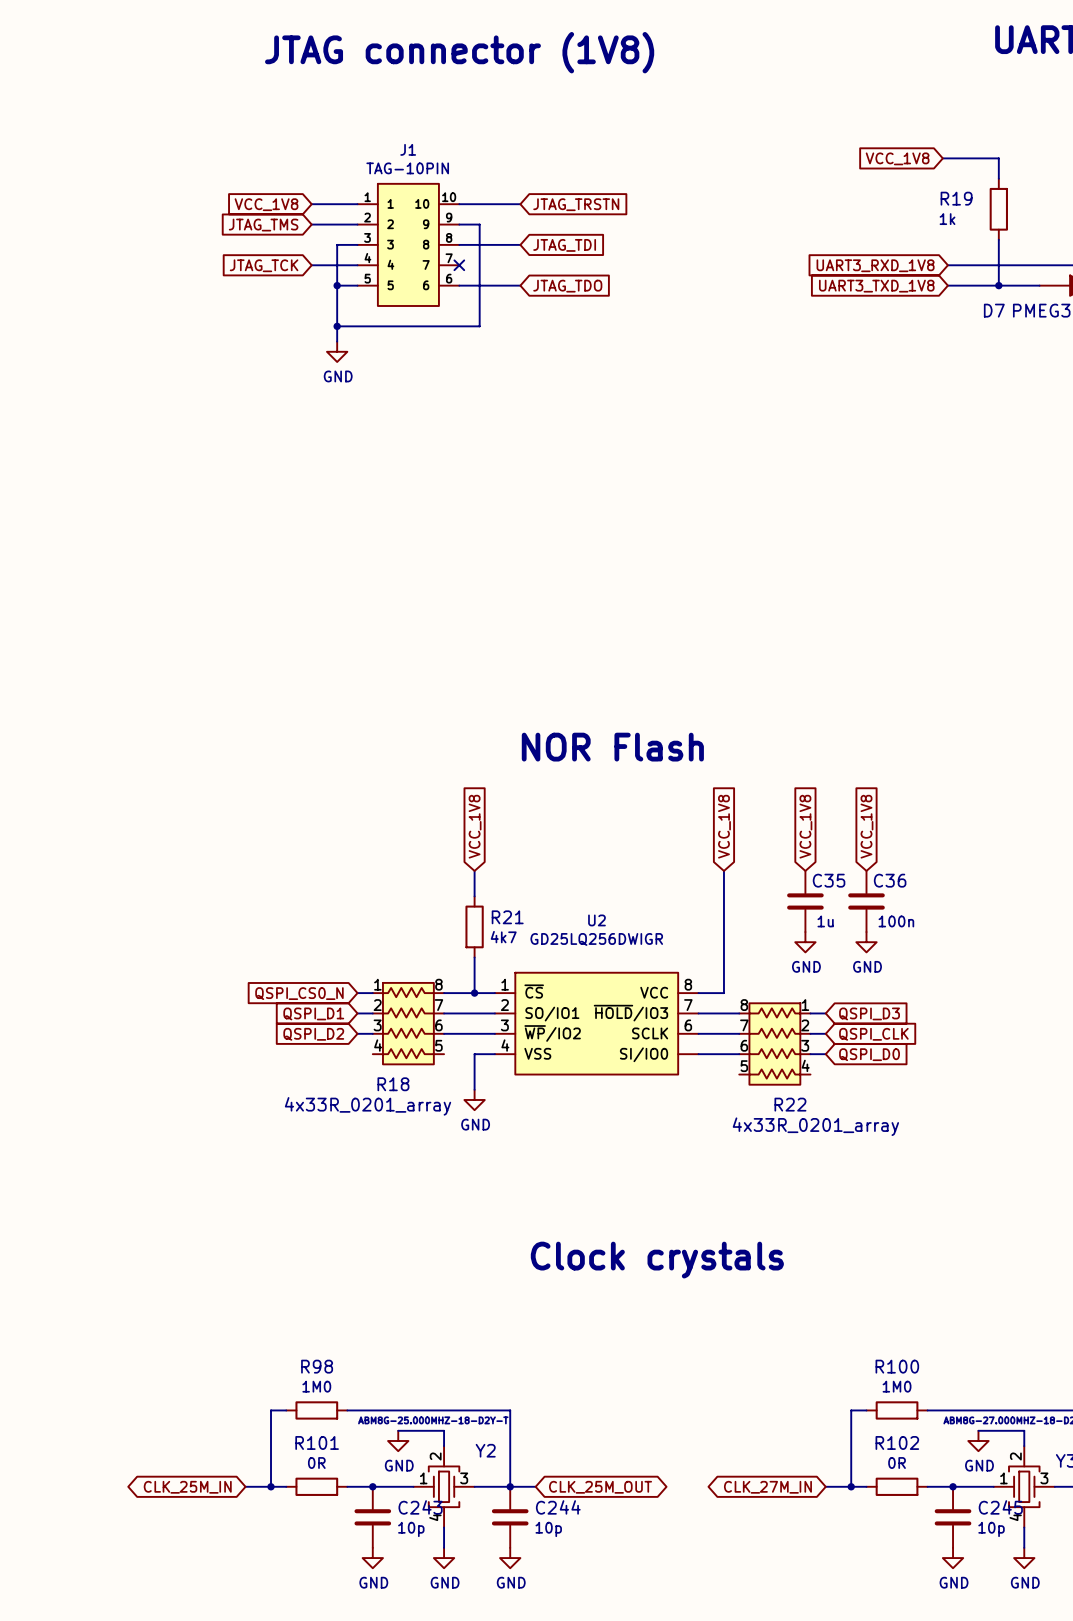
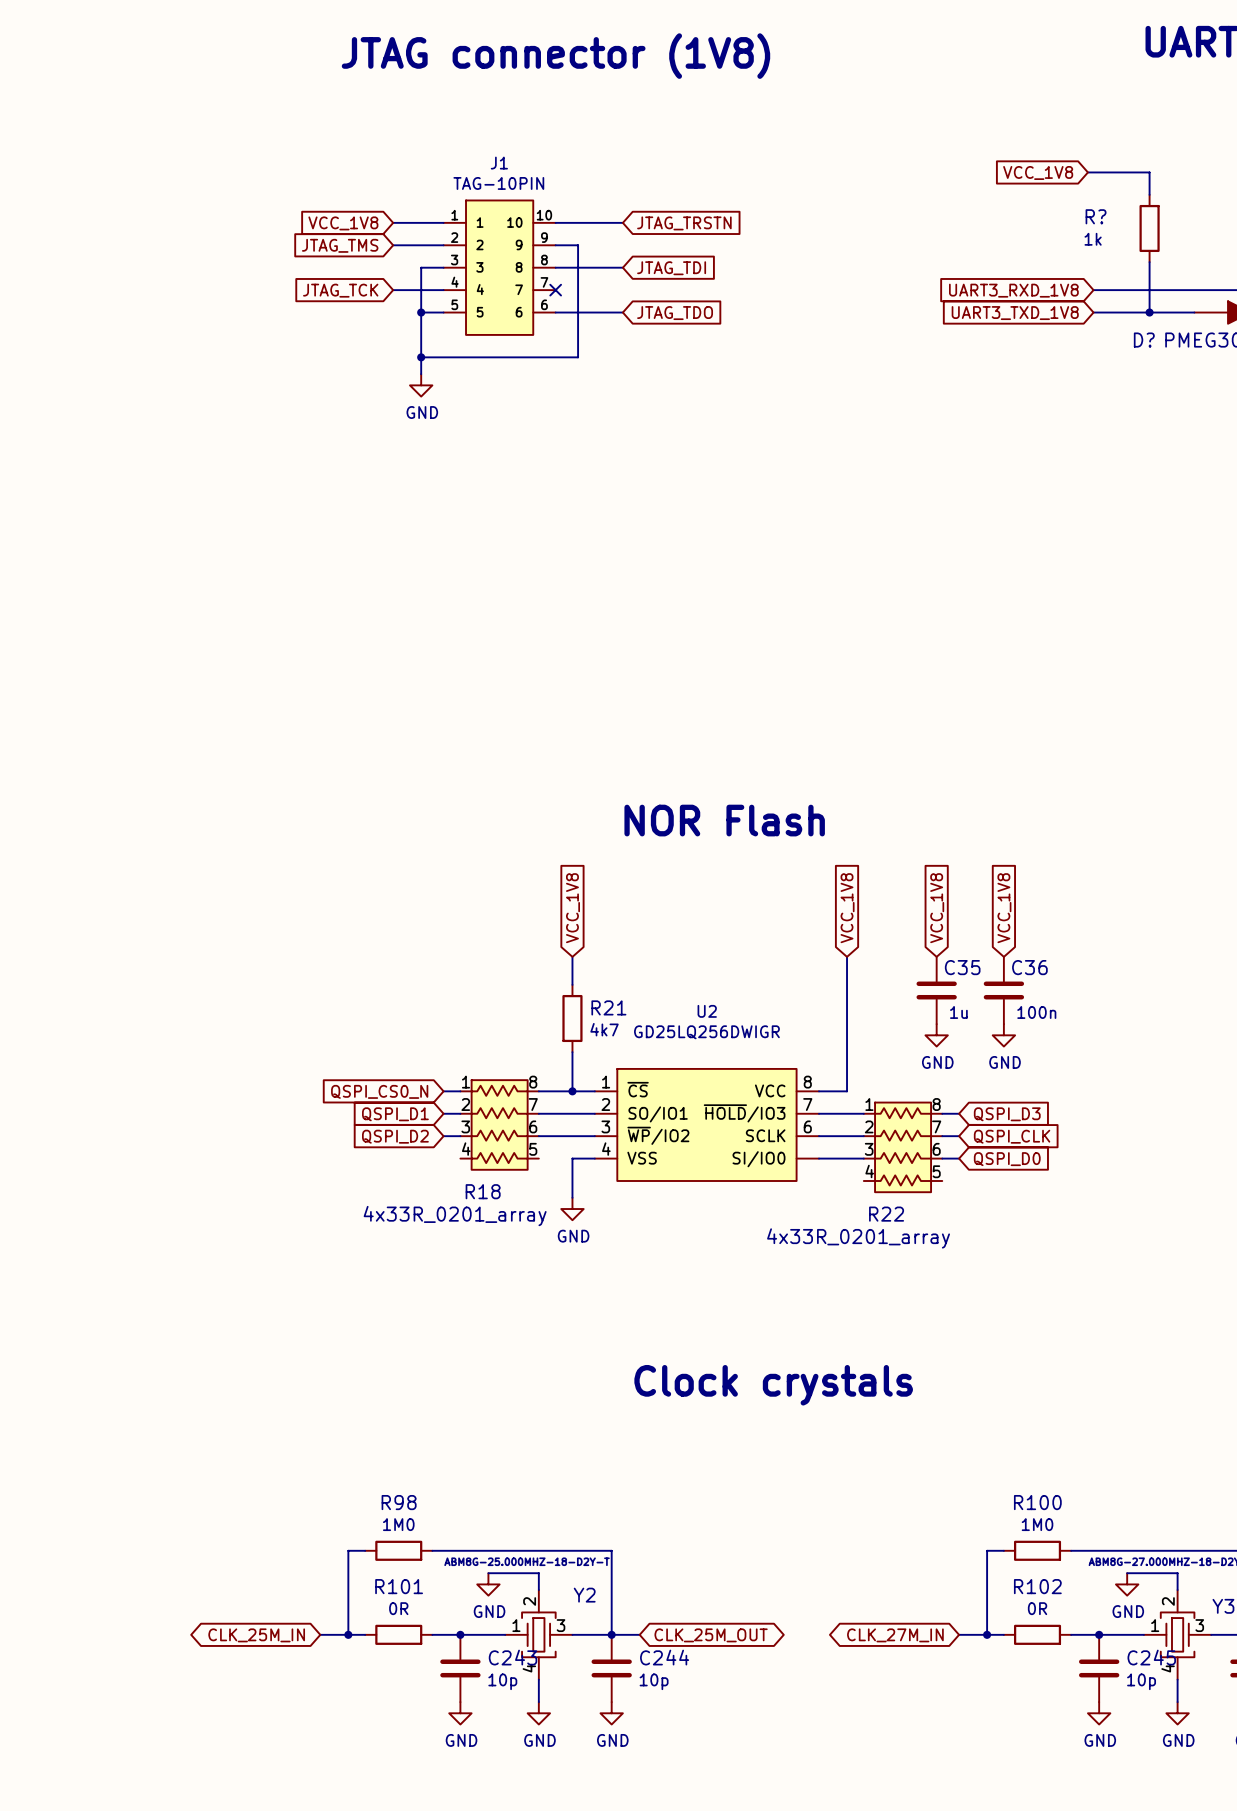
R19 name: R19 (956, 198) -> R? (1096, 216)
D7 name: D7 (994, 310) -> D? (1144, 340)
R22 flip: as is (774, 1044) -> left-right (903, 1147)

